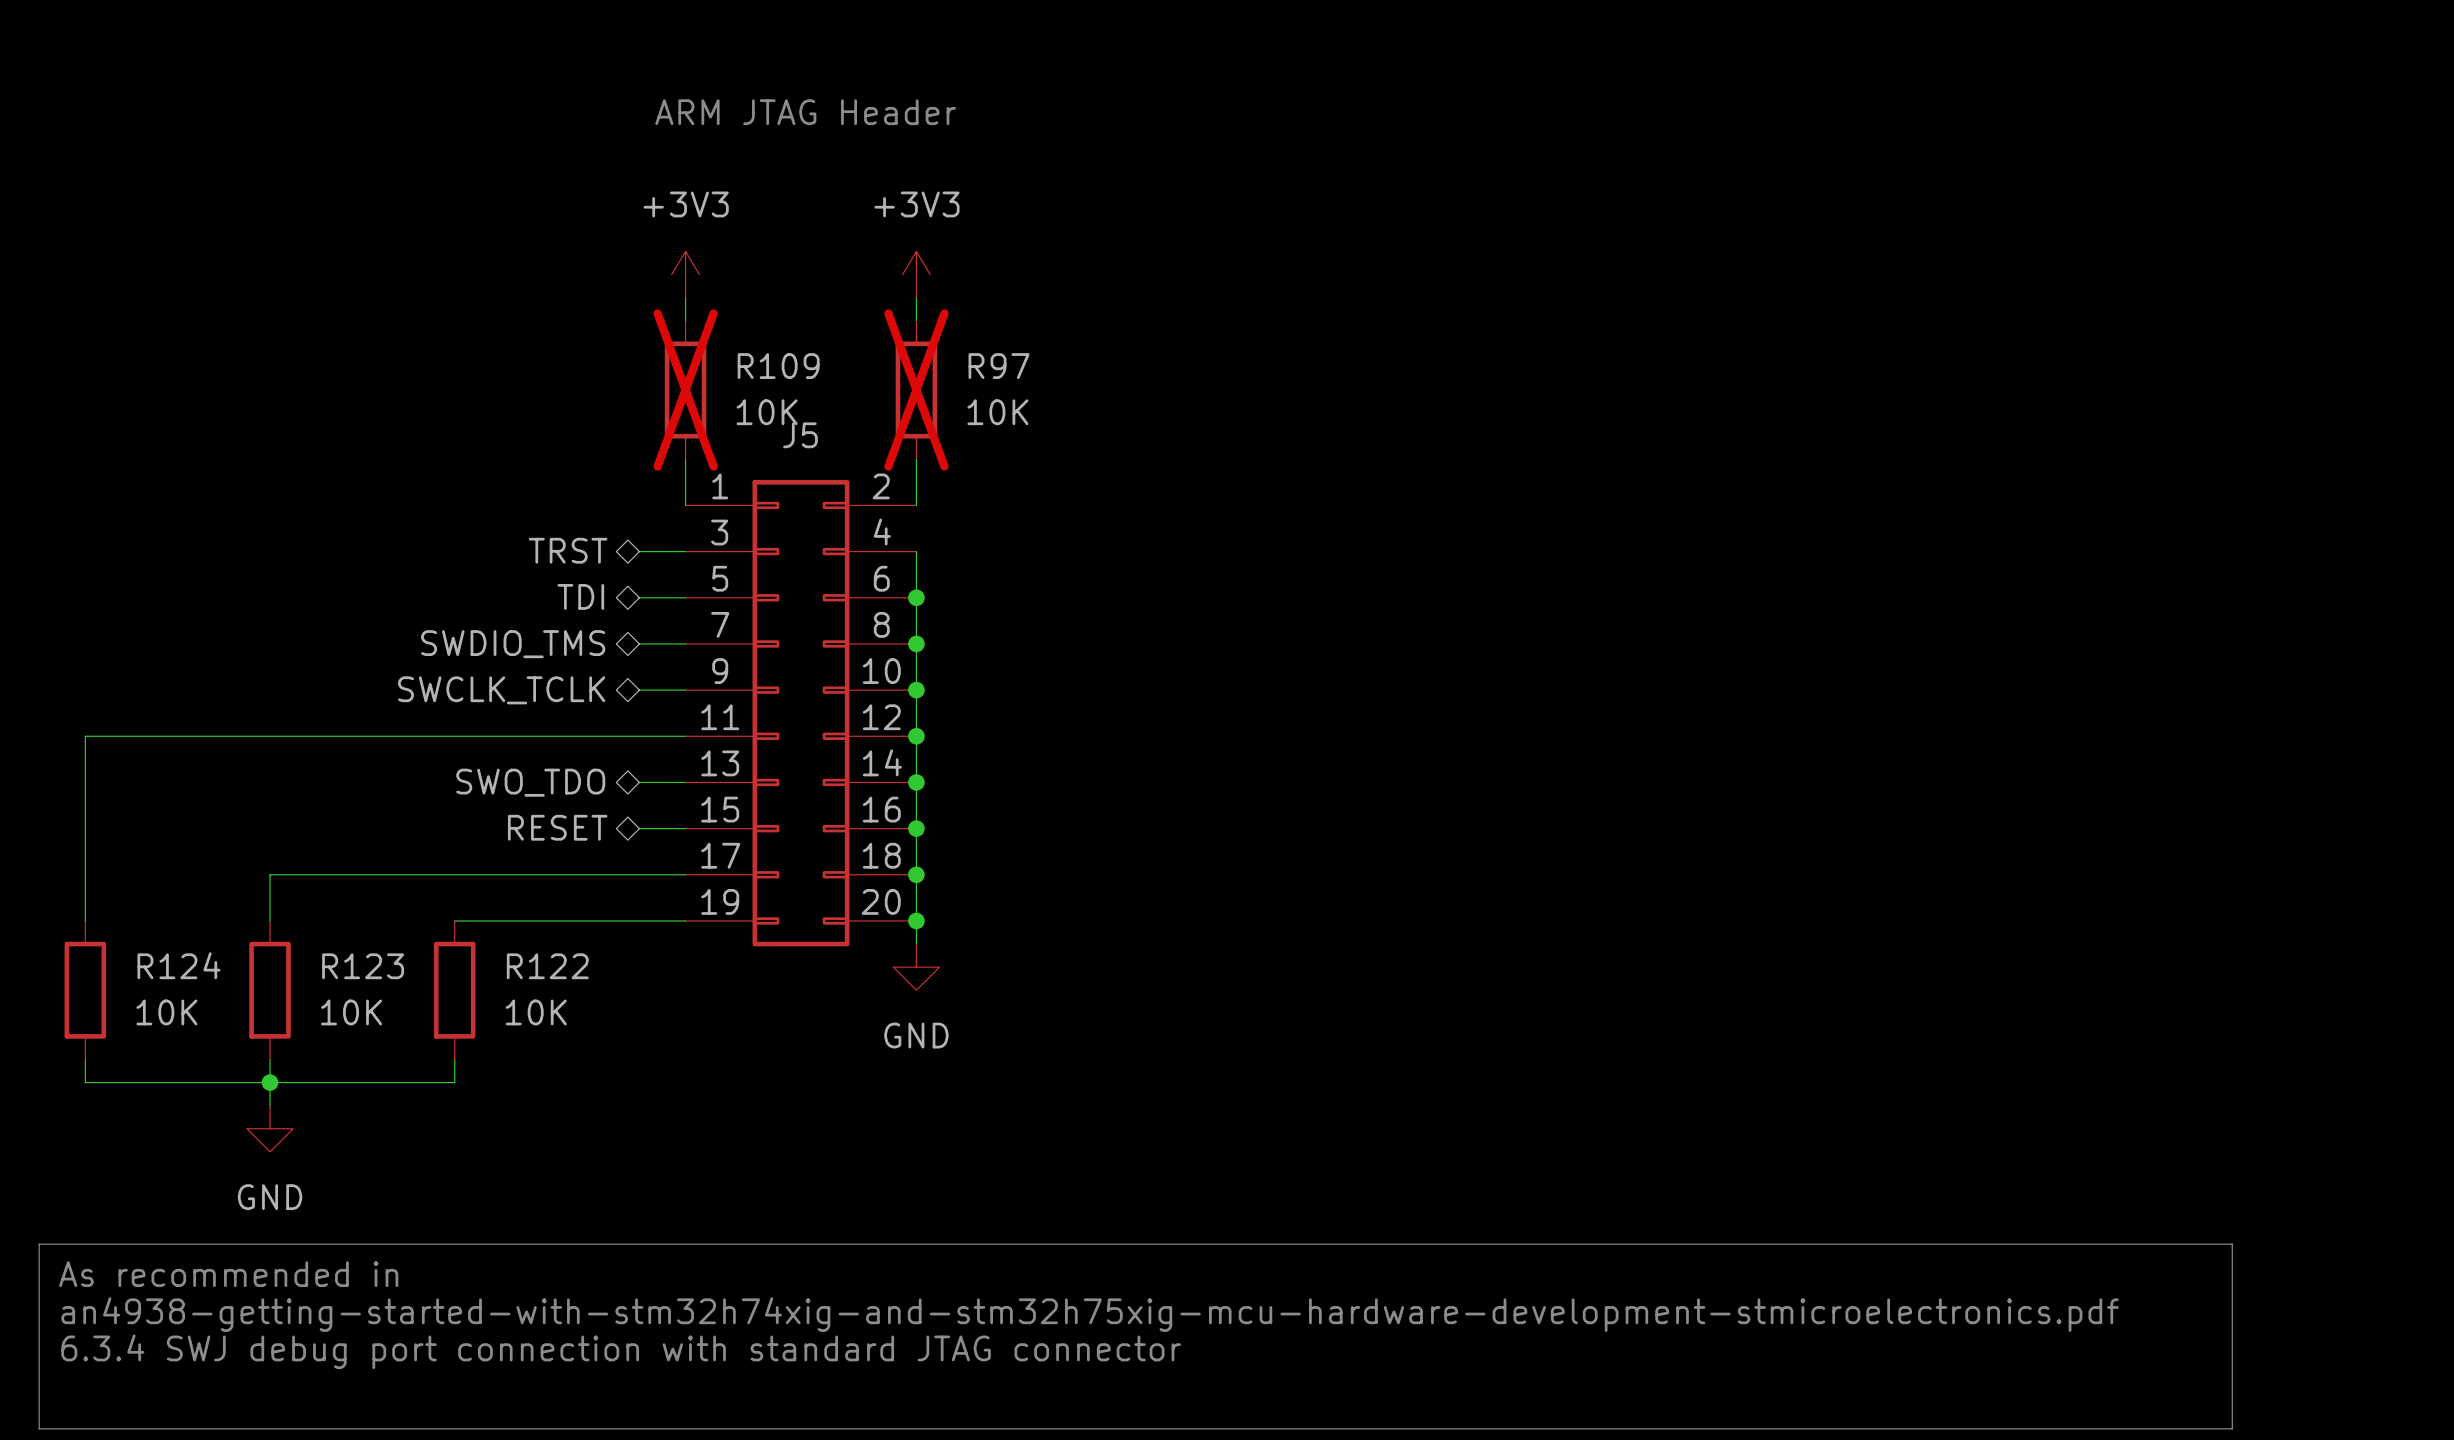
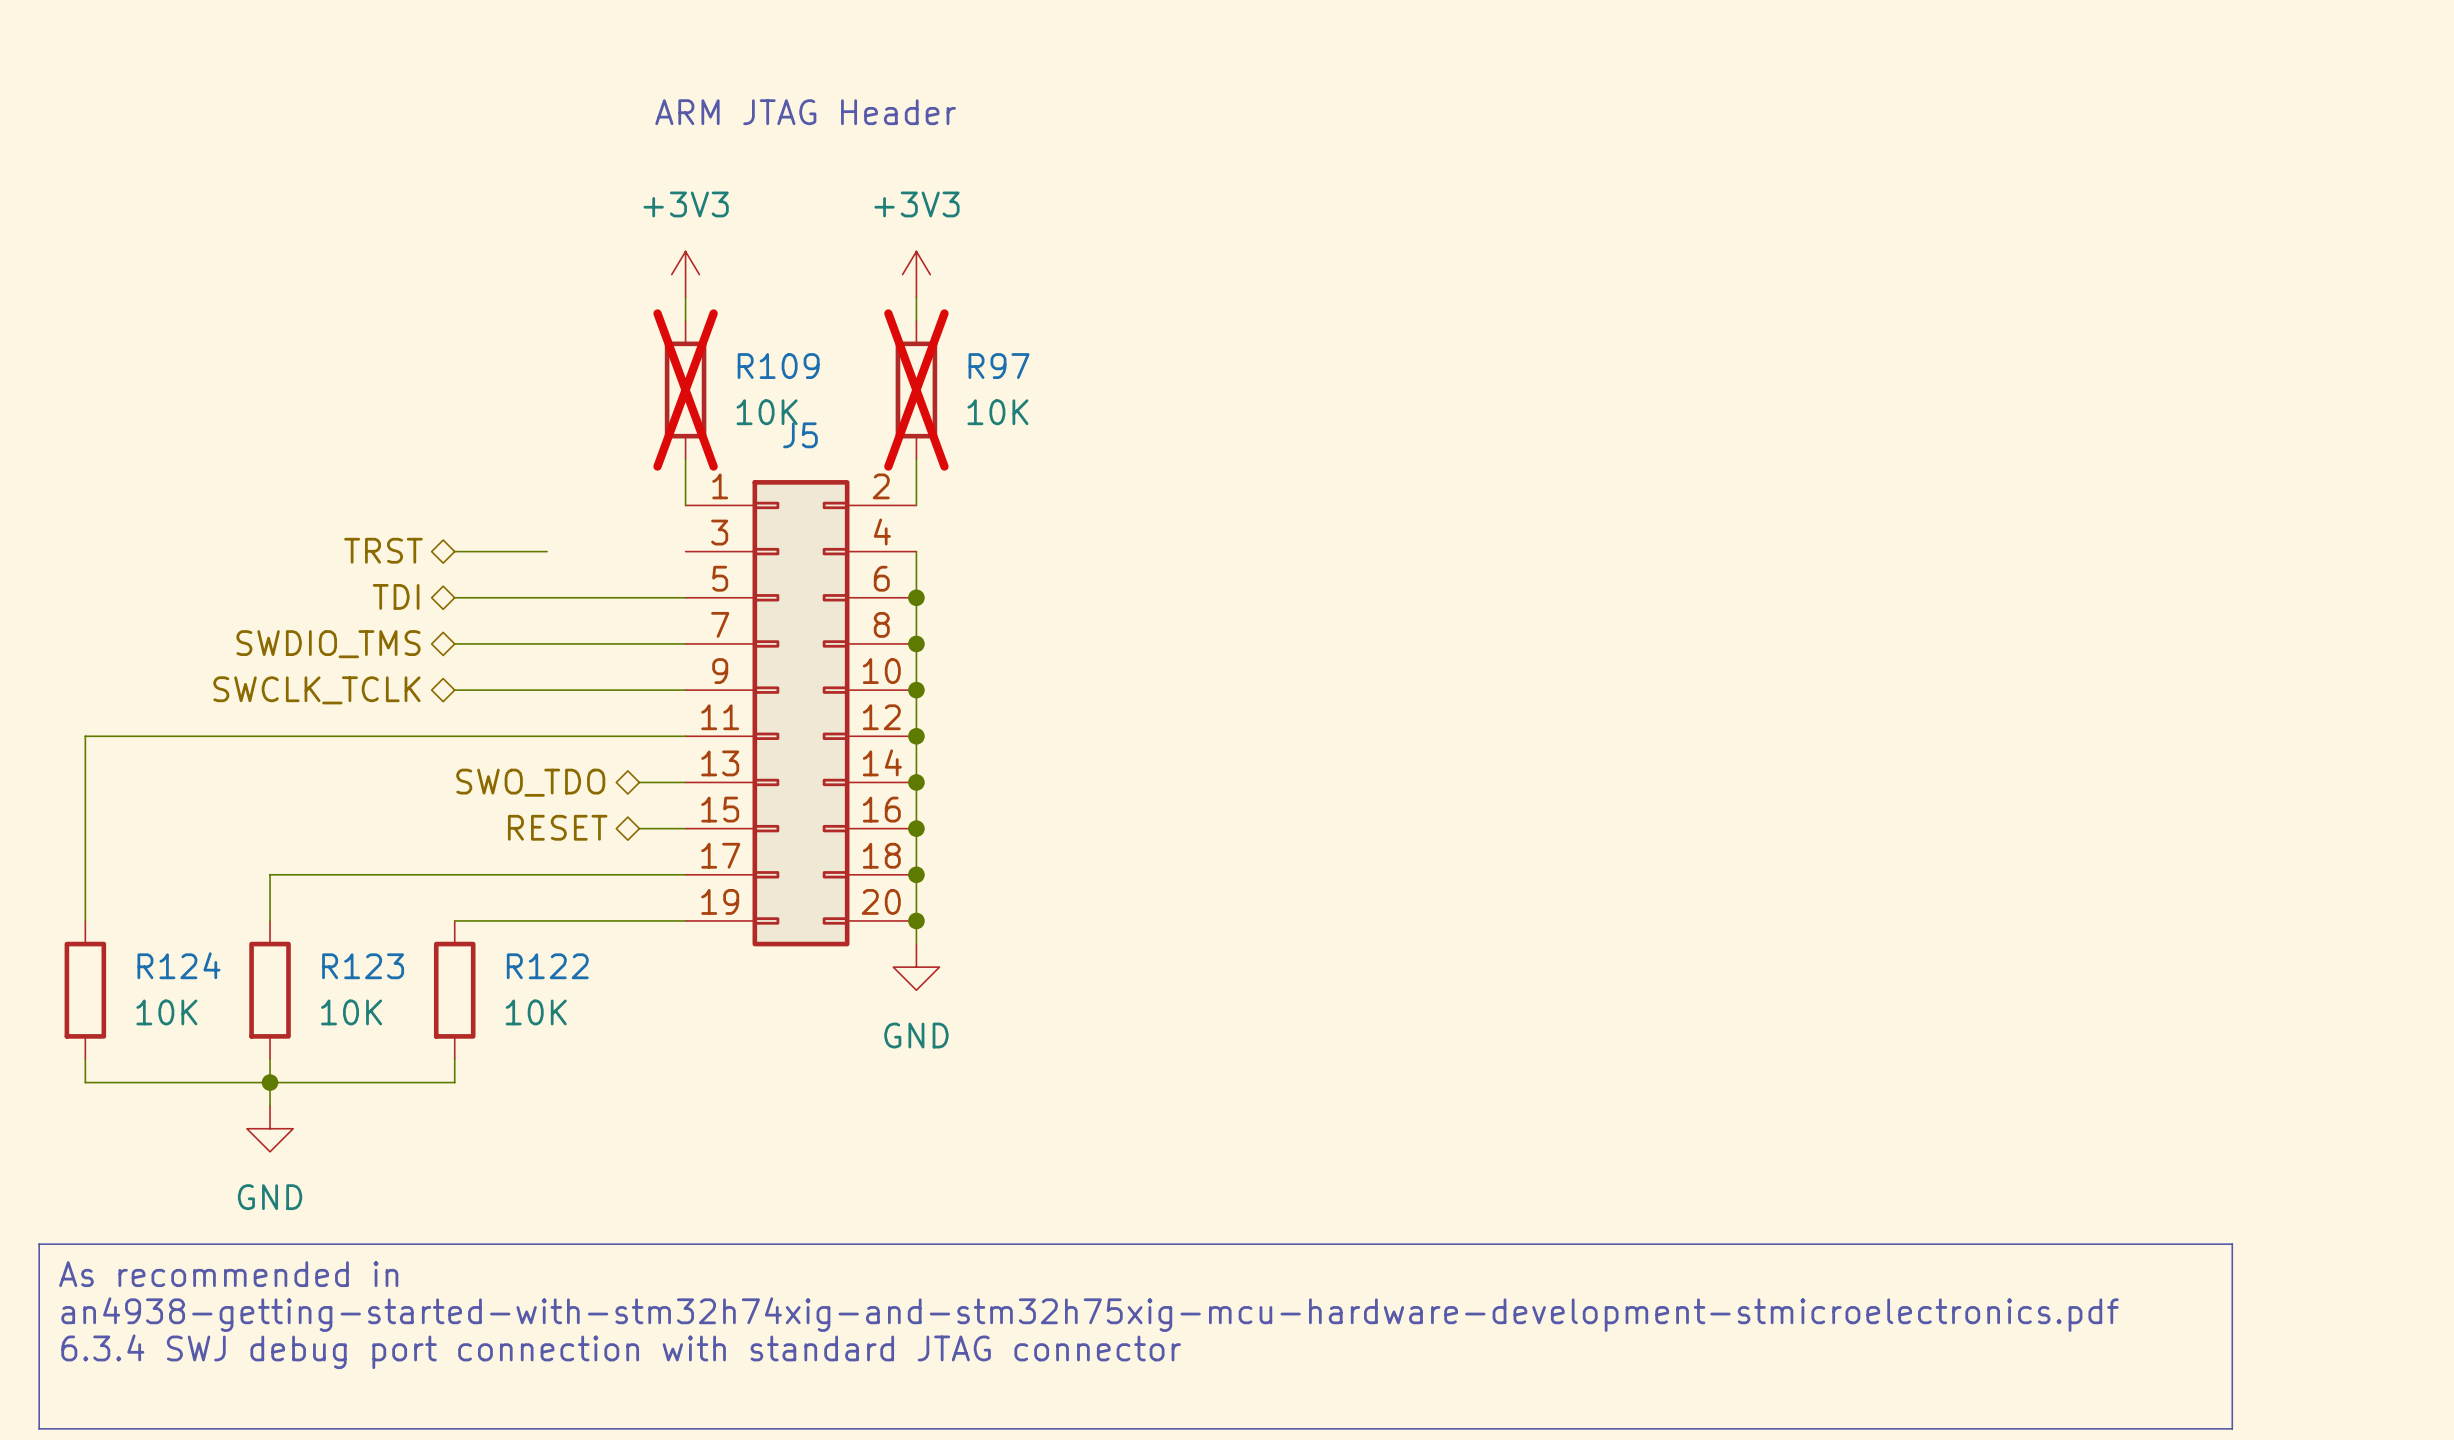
hierarchical label position: TRST (568, 550) -> TRST (383, 550)
wire: none -> (454, 551) (547, 551)
wire: (639, 551) (685, 551) -> none
hierarchical label position: TDI (580, 596) -> TDI (396, 596)
wire: none -> (454, 597) (639, 597)
wire: none -> (454, 643) (639, 643)
hierarchical label position: SWDIO_TMS (513, 644) -> SWDIO_TMS (328, 644)
wire: none -> (454, 690) (639, 690)
hierarchical label position: SWCLK_TCLK (501, 690) -> SWCLK_TCLK (316, 690)

